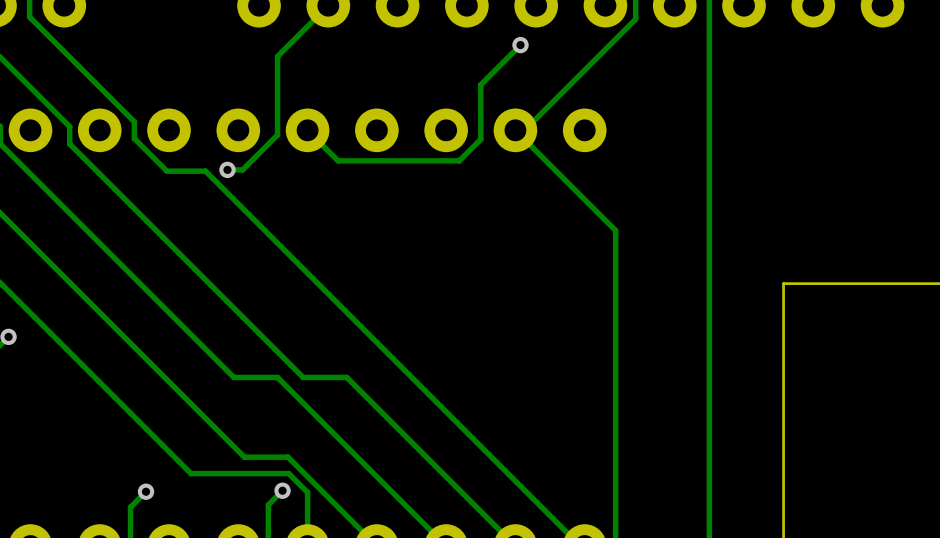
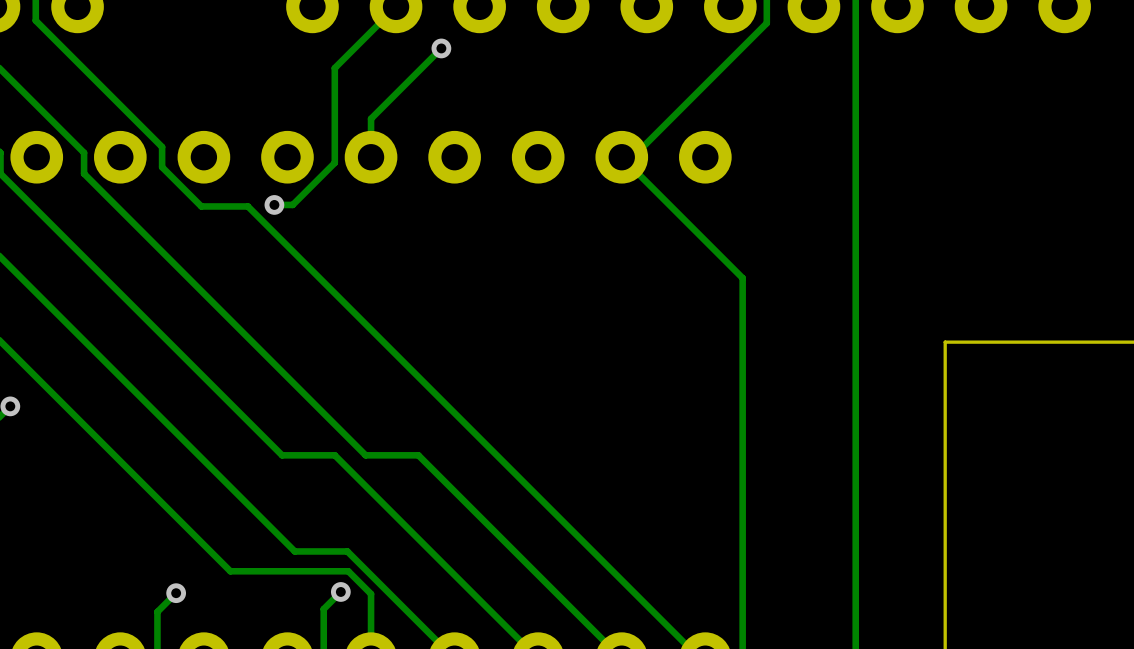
track: (520, 45) (480, 84) (480, 139) (459, 160) (338, 160) (307, 130) -> (441, 48) (371, 118) (371, 157)
via position: (520, 45) -> (441, 48)

